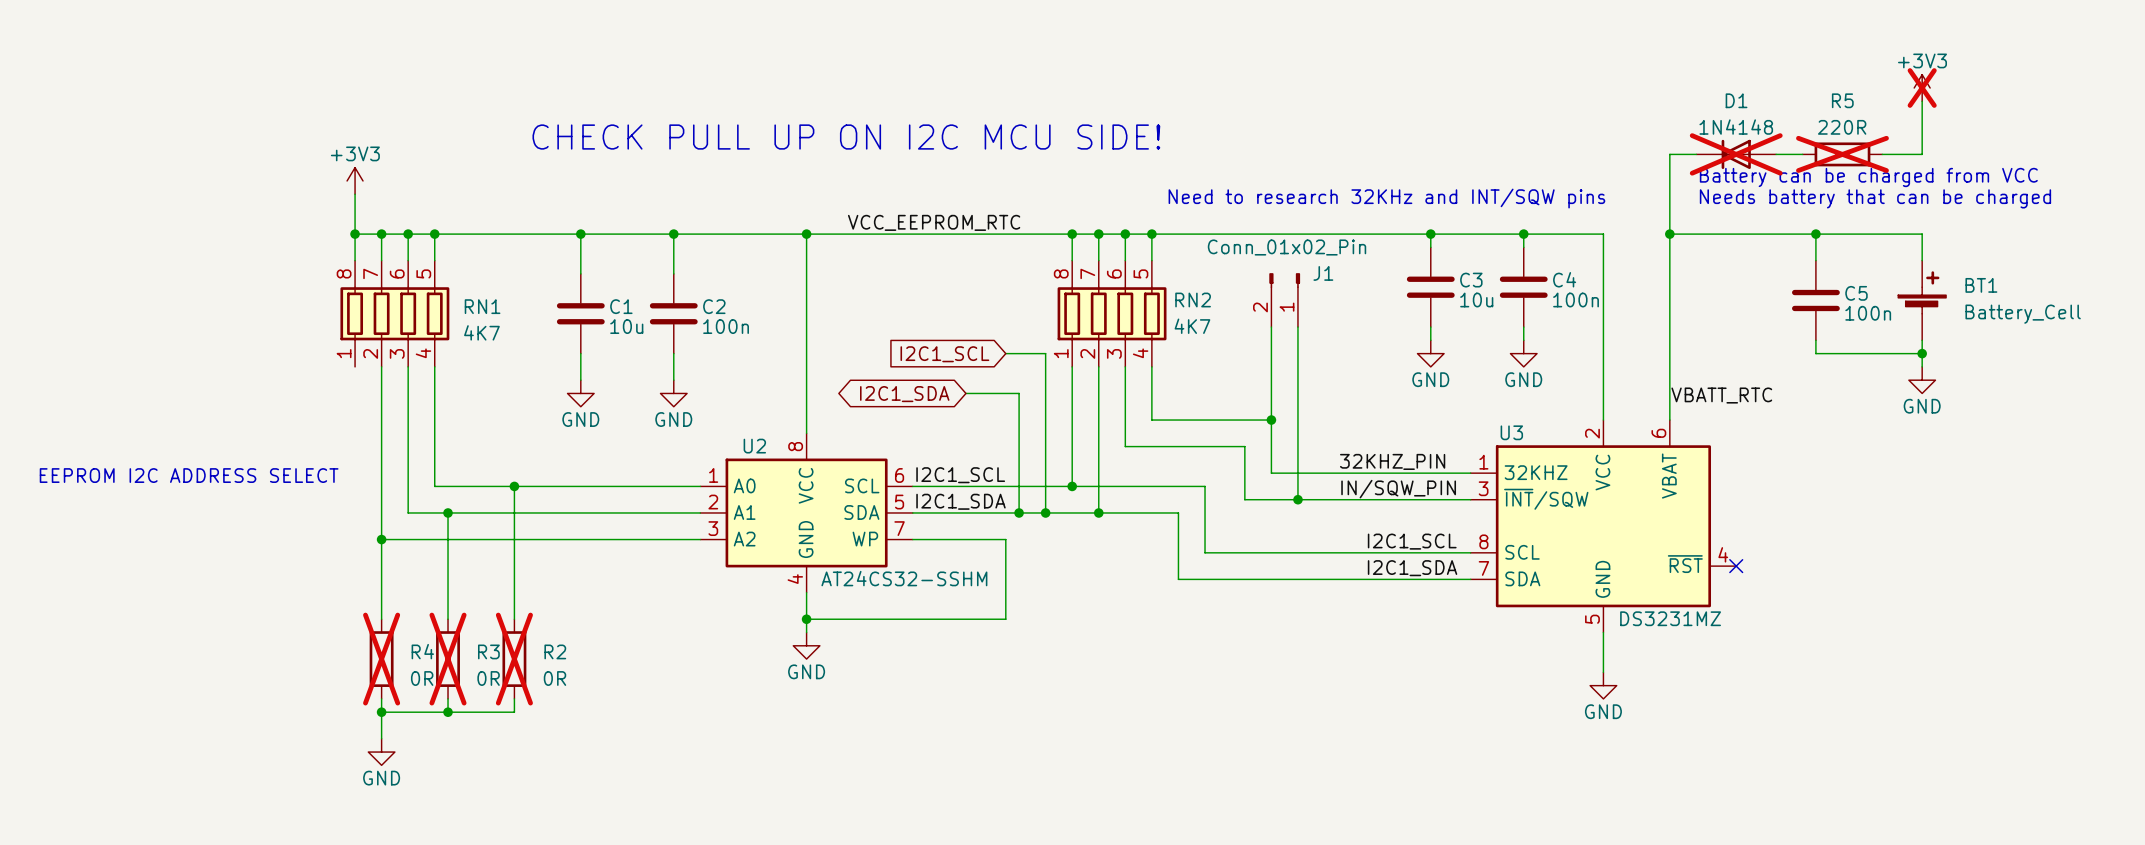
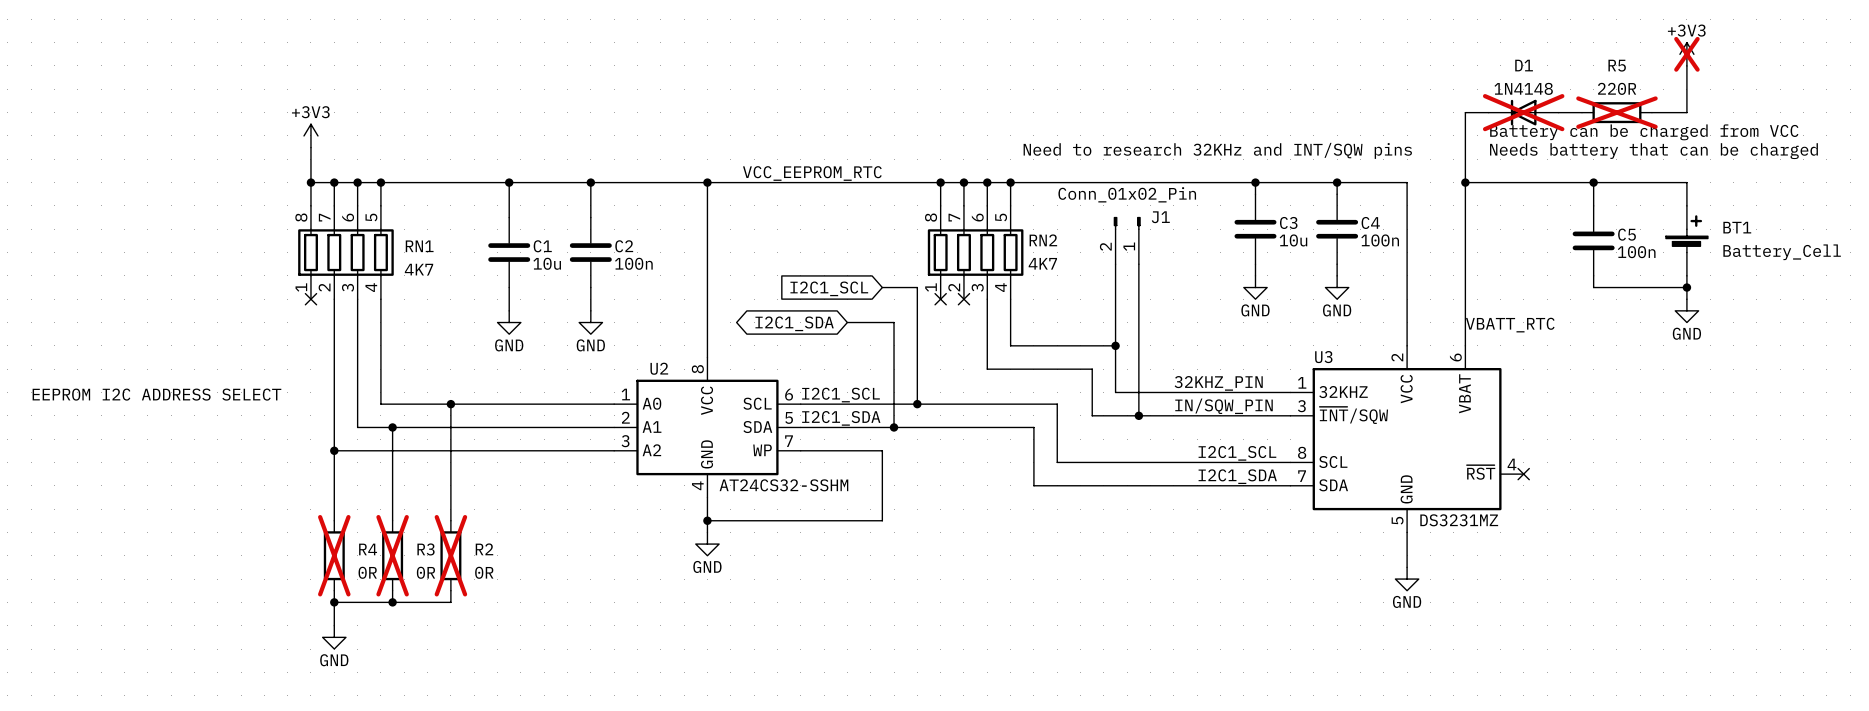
text: CHECK PULL UP ON I2C MCU SIDE! (846, 137) -> none
no-connect mark: none -> (310, 299)
wire: (1072, 366) (1072, 486) -> none
no-connect mark: none -> (940, 299)
wire: (1098, 366) (1098, 512) -> none
no-connect mark: none -> (963, 299)
wire: (1045, 486) (1045, 512) -> none
junction: none -> (917, 404)
junction: (1072, 486) -> none
junction: (1045, 512) -> none
junction: (1098, 512) -> none

